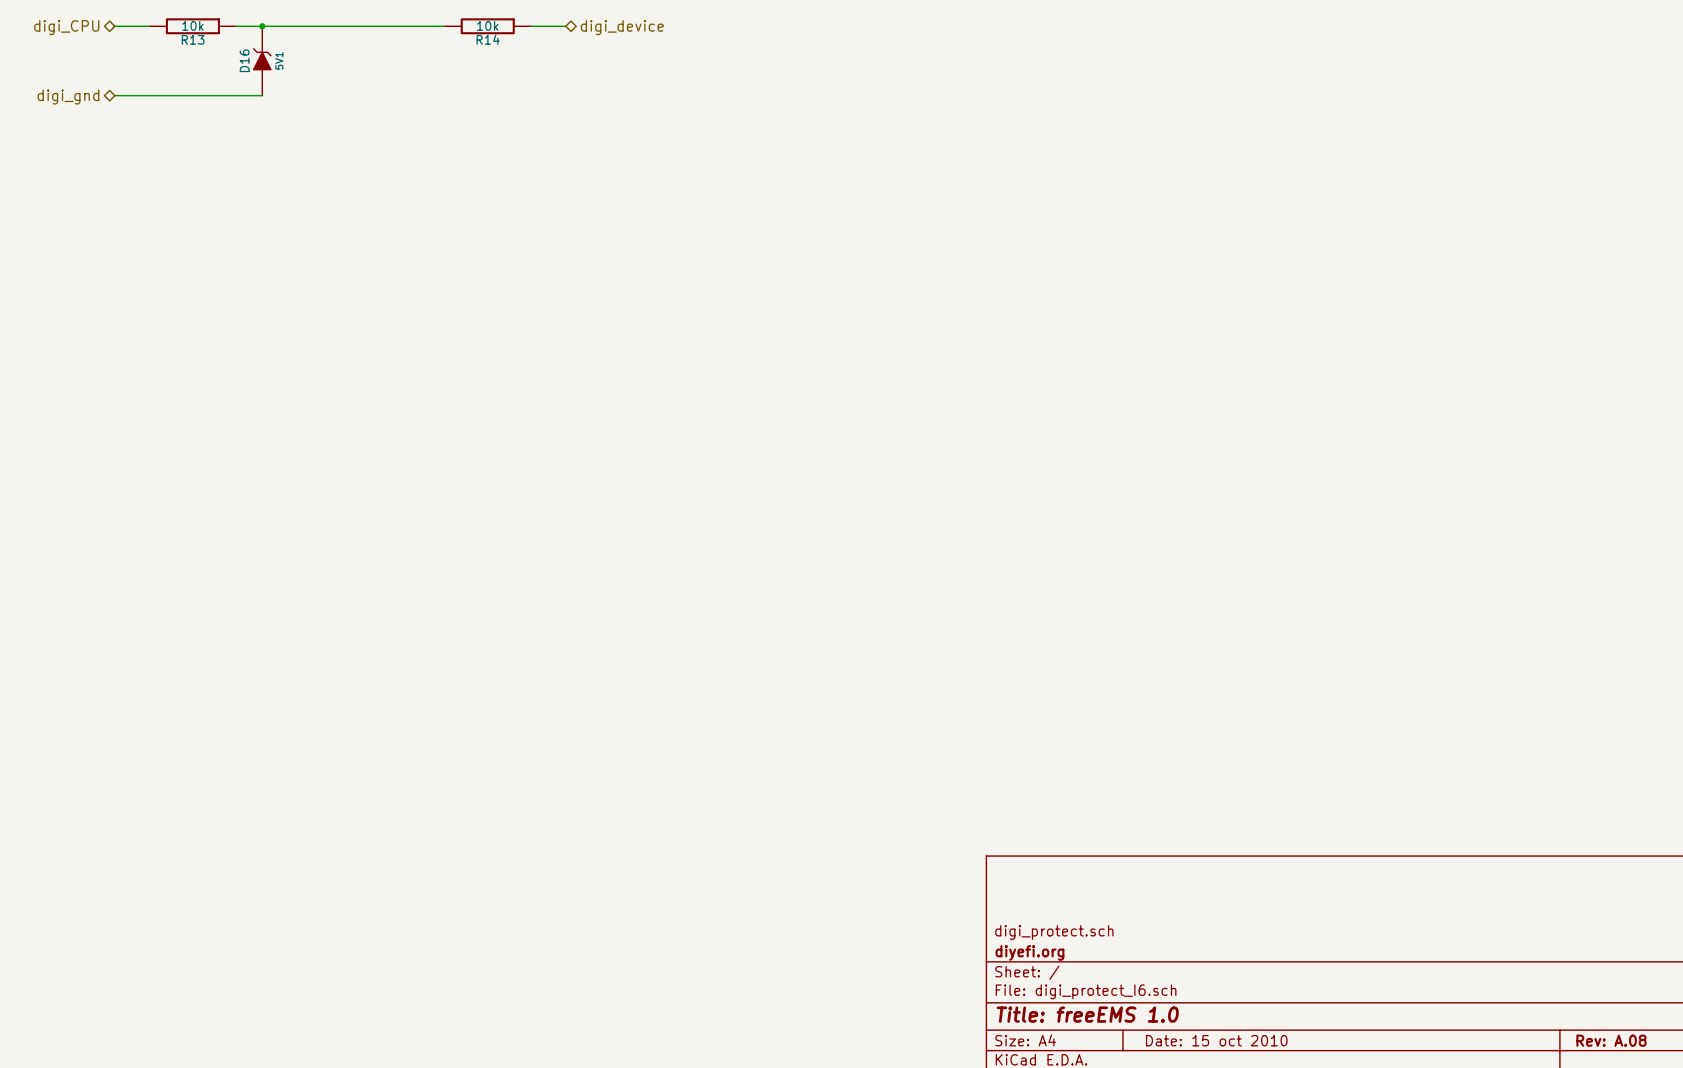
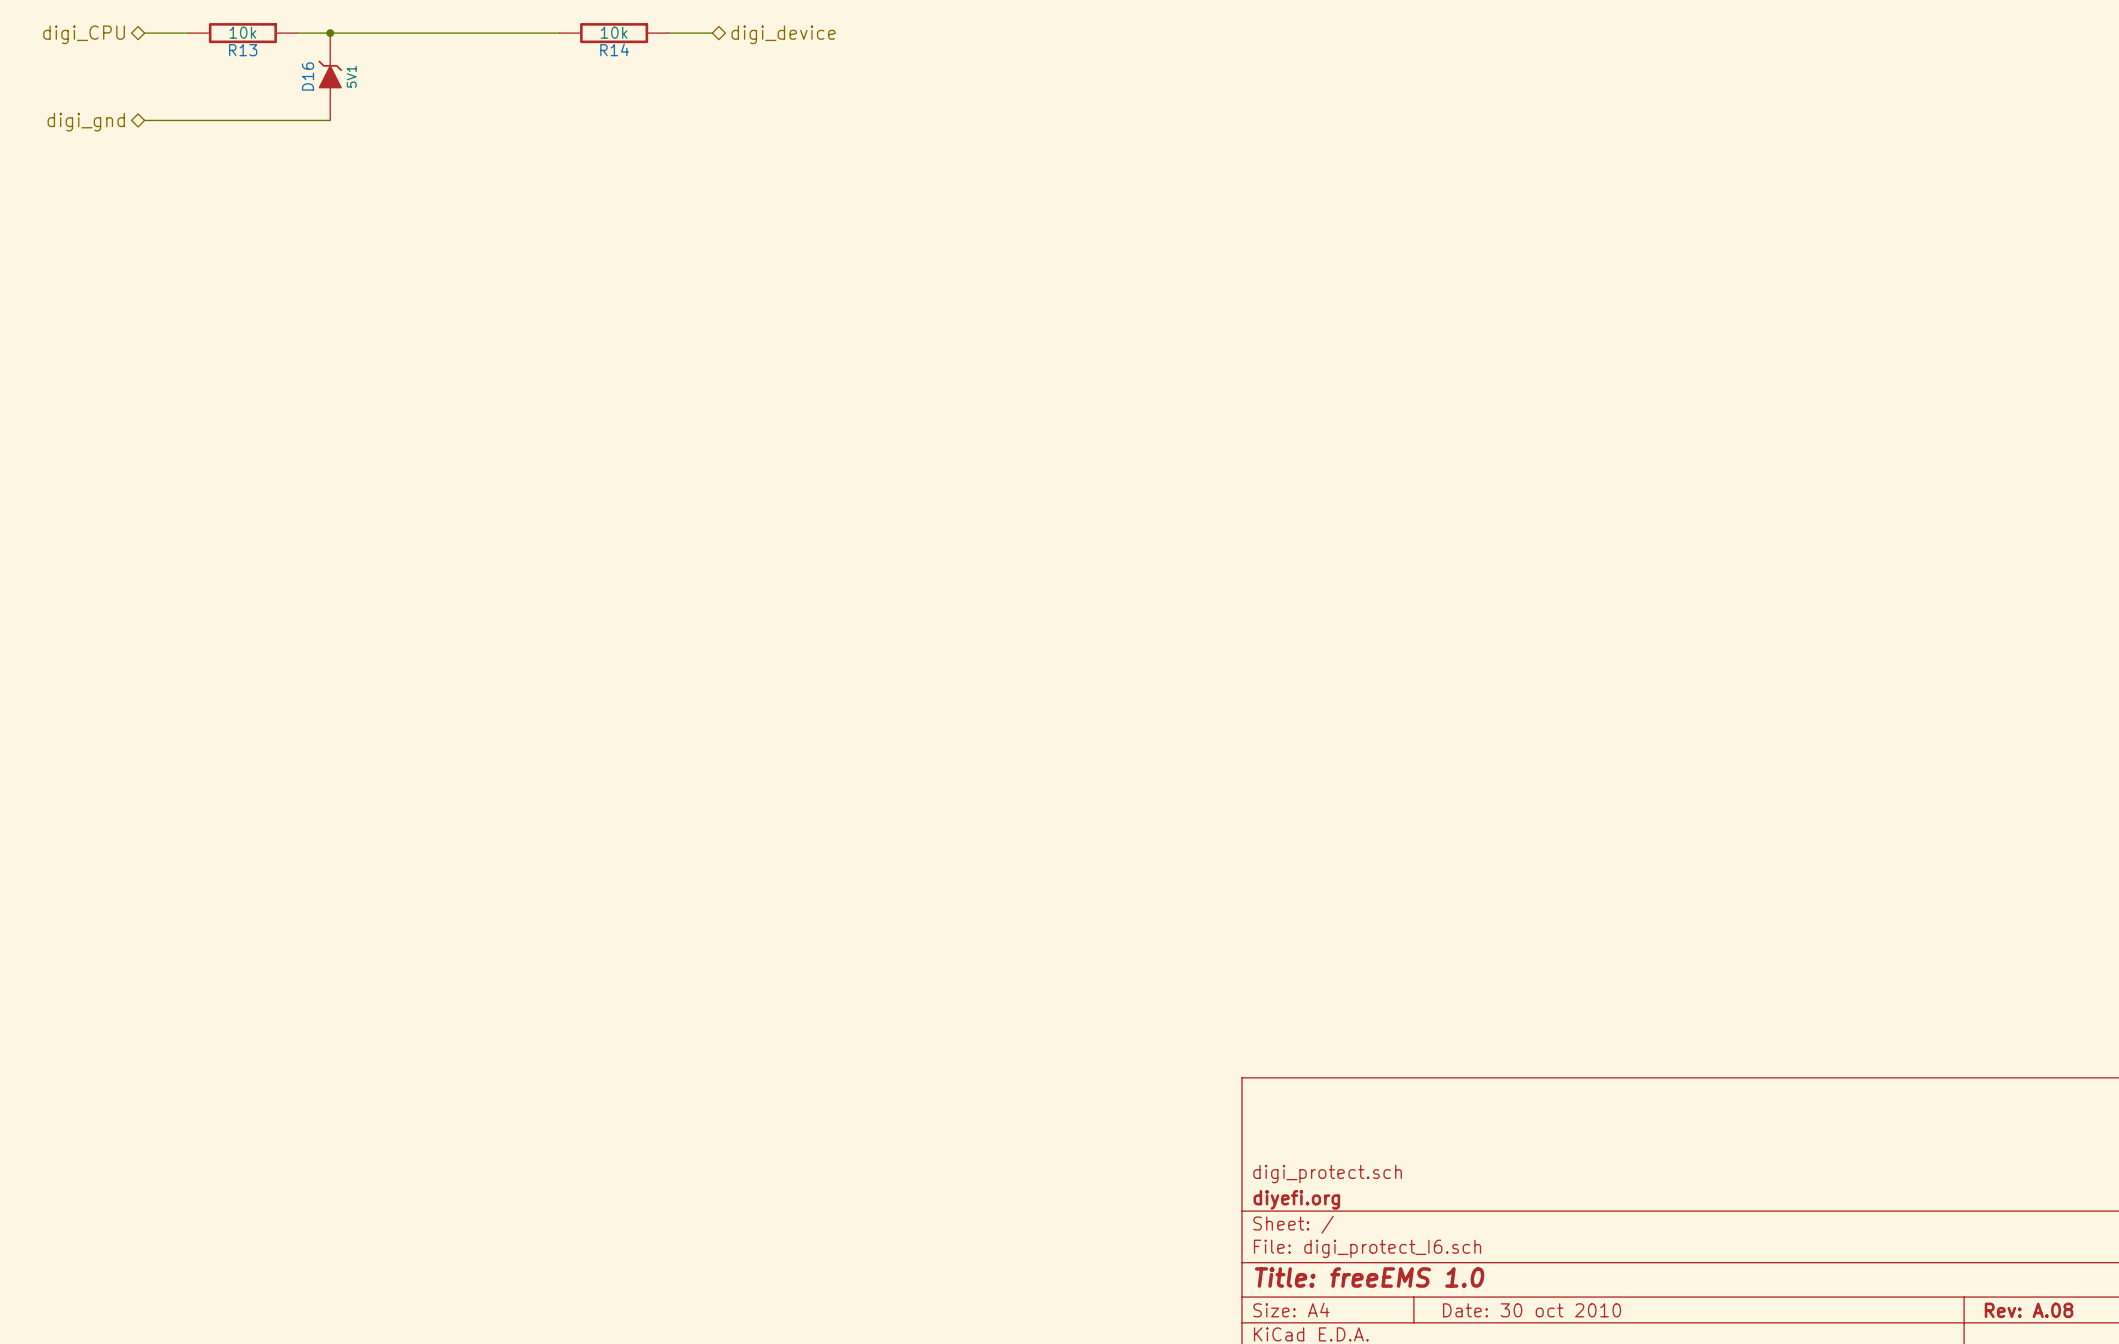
title block: Date: 15 oct 2010 (1216, 1040) -> Date: 30 oct 2010 (1532, 1310)

